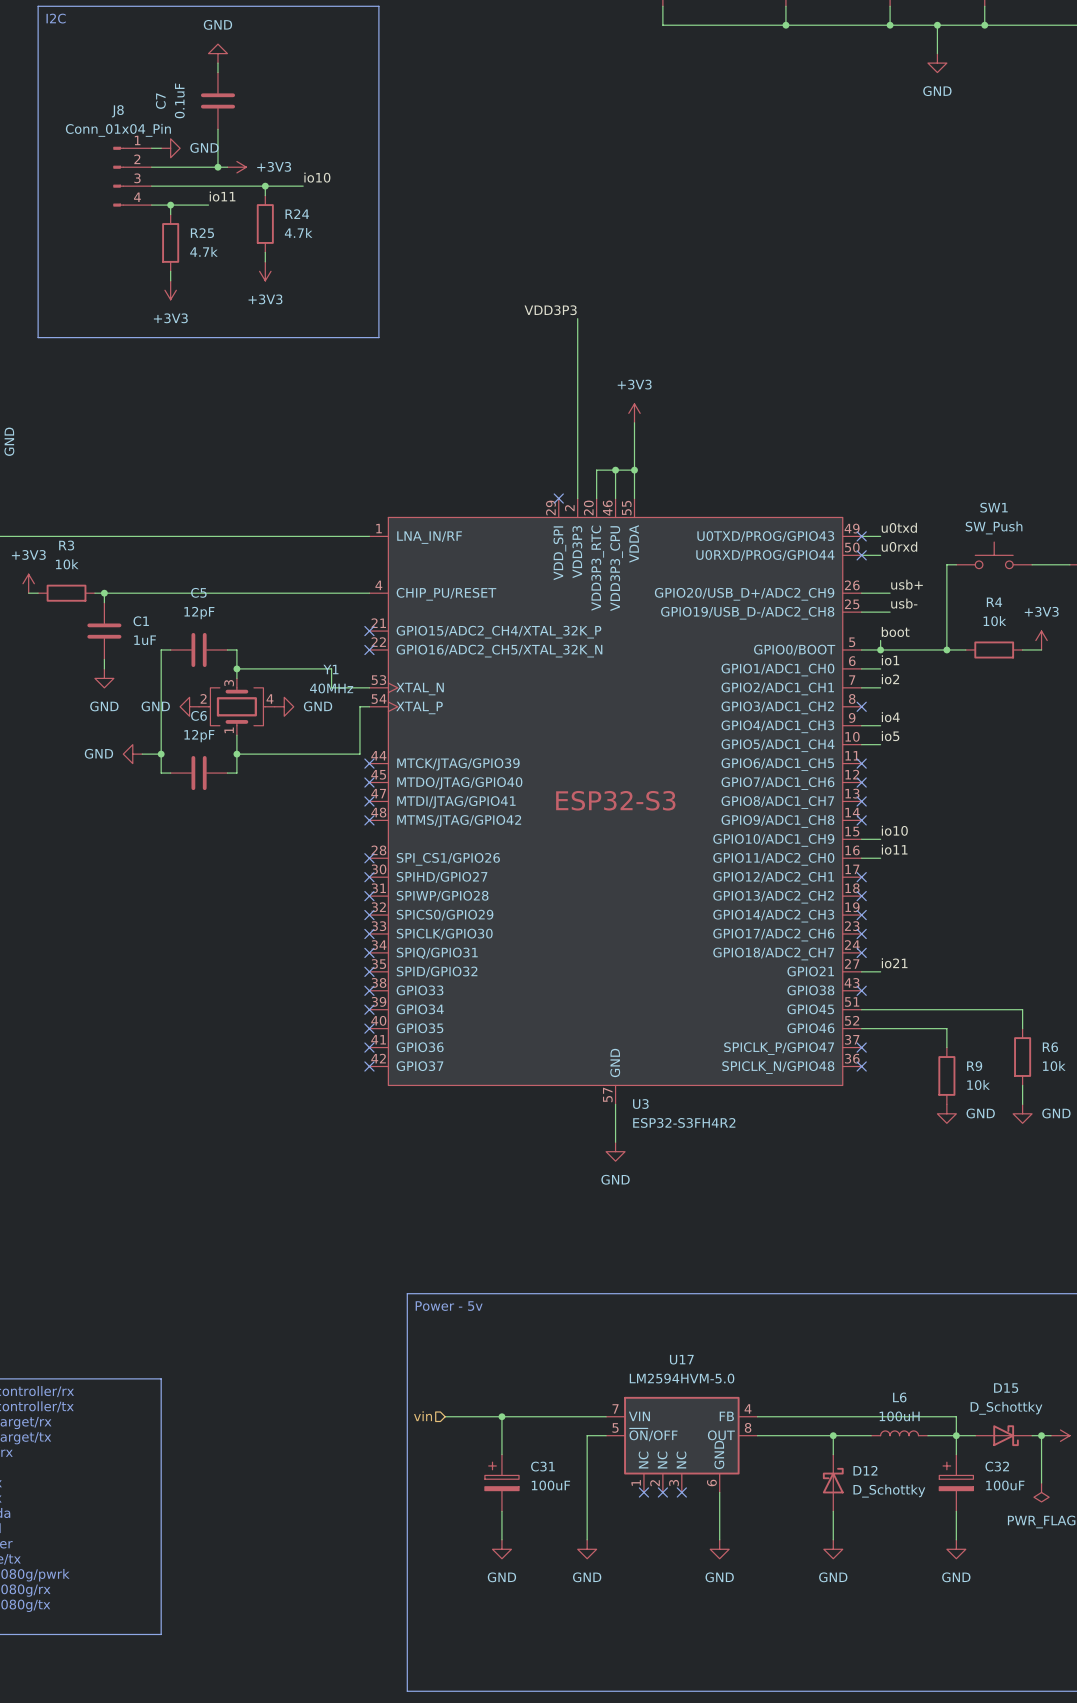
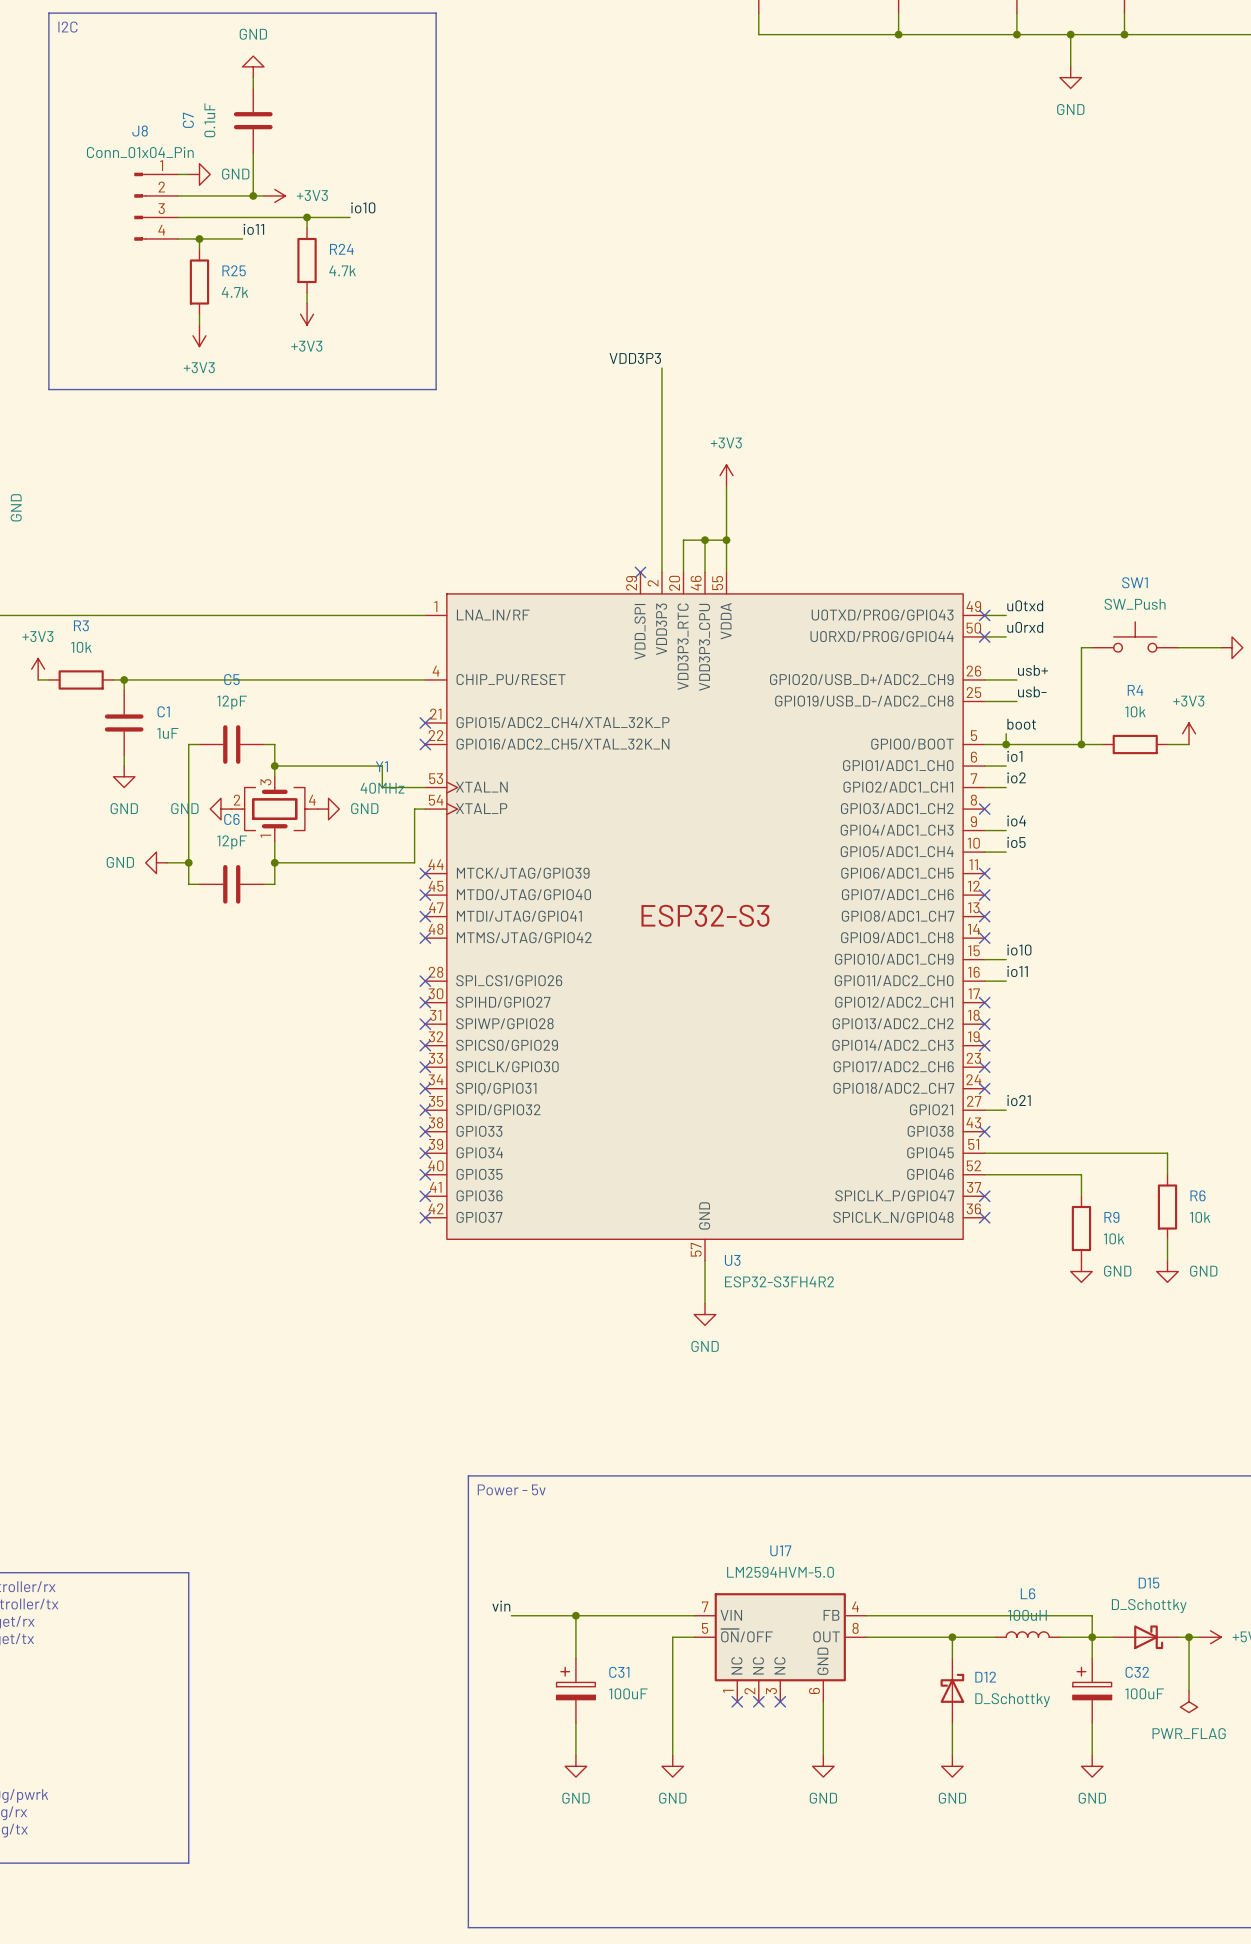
label: none -> vin (501, 1606)
hierarchical label: vin (423, 1416) -> none

